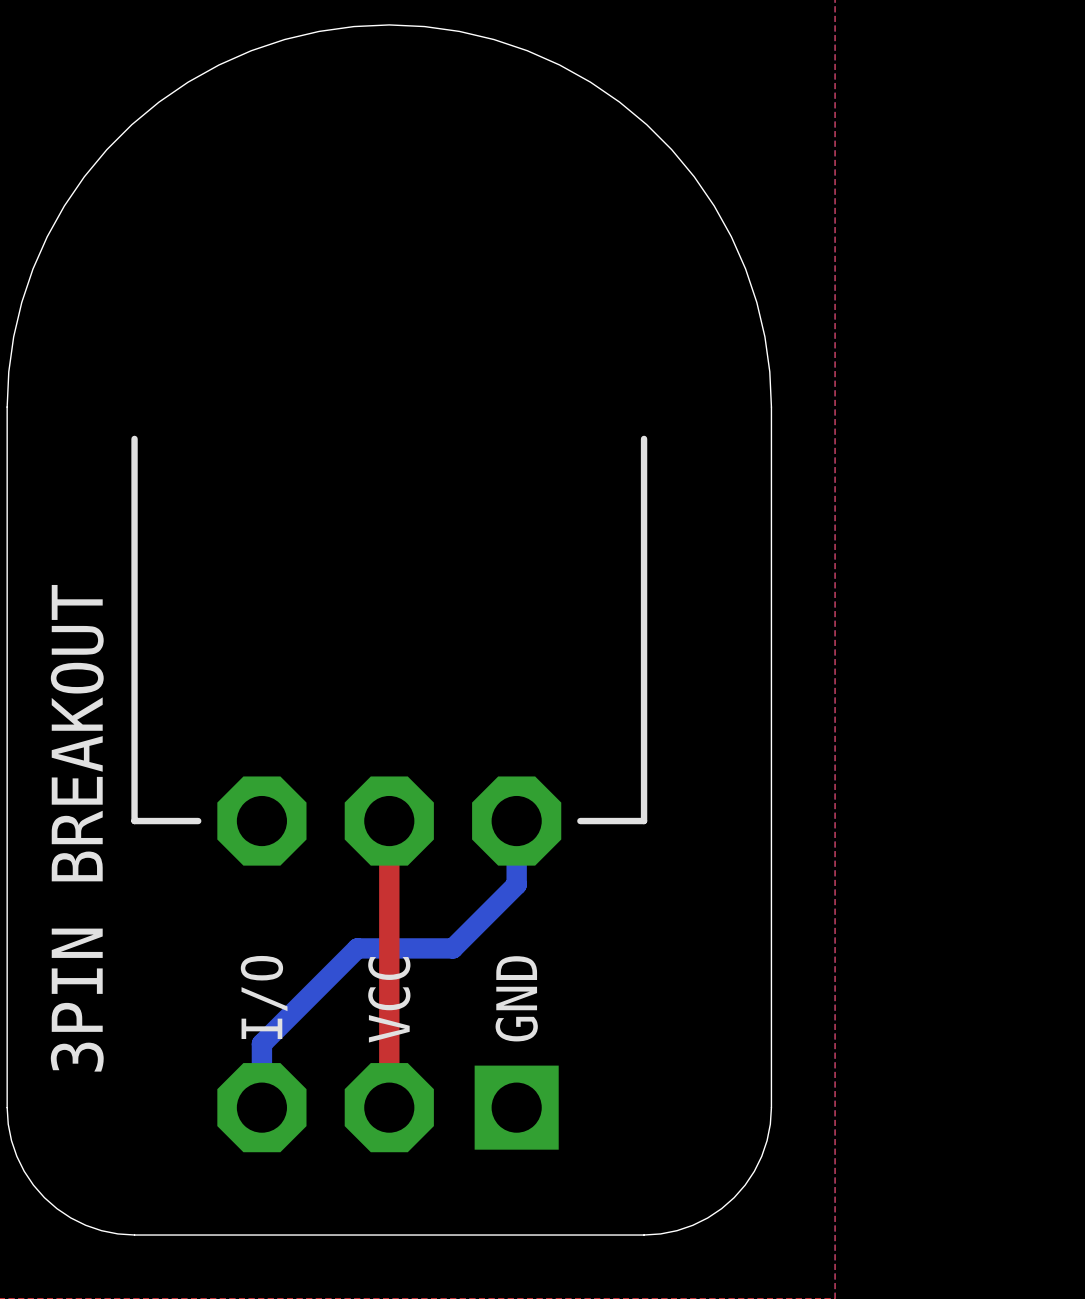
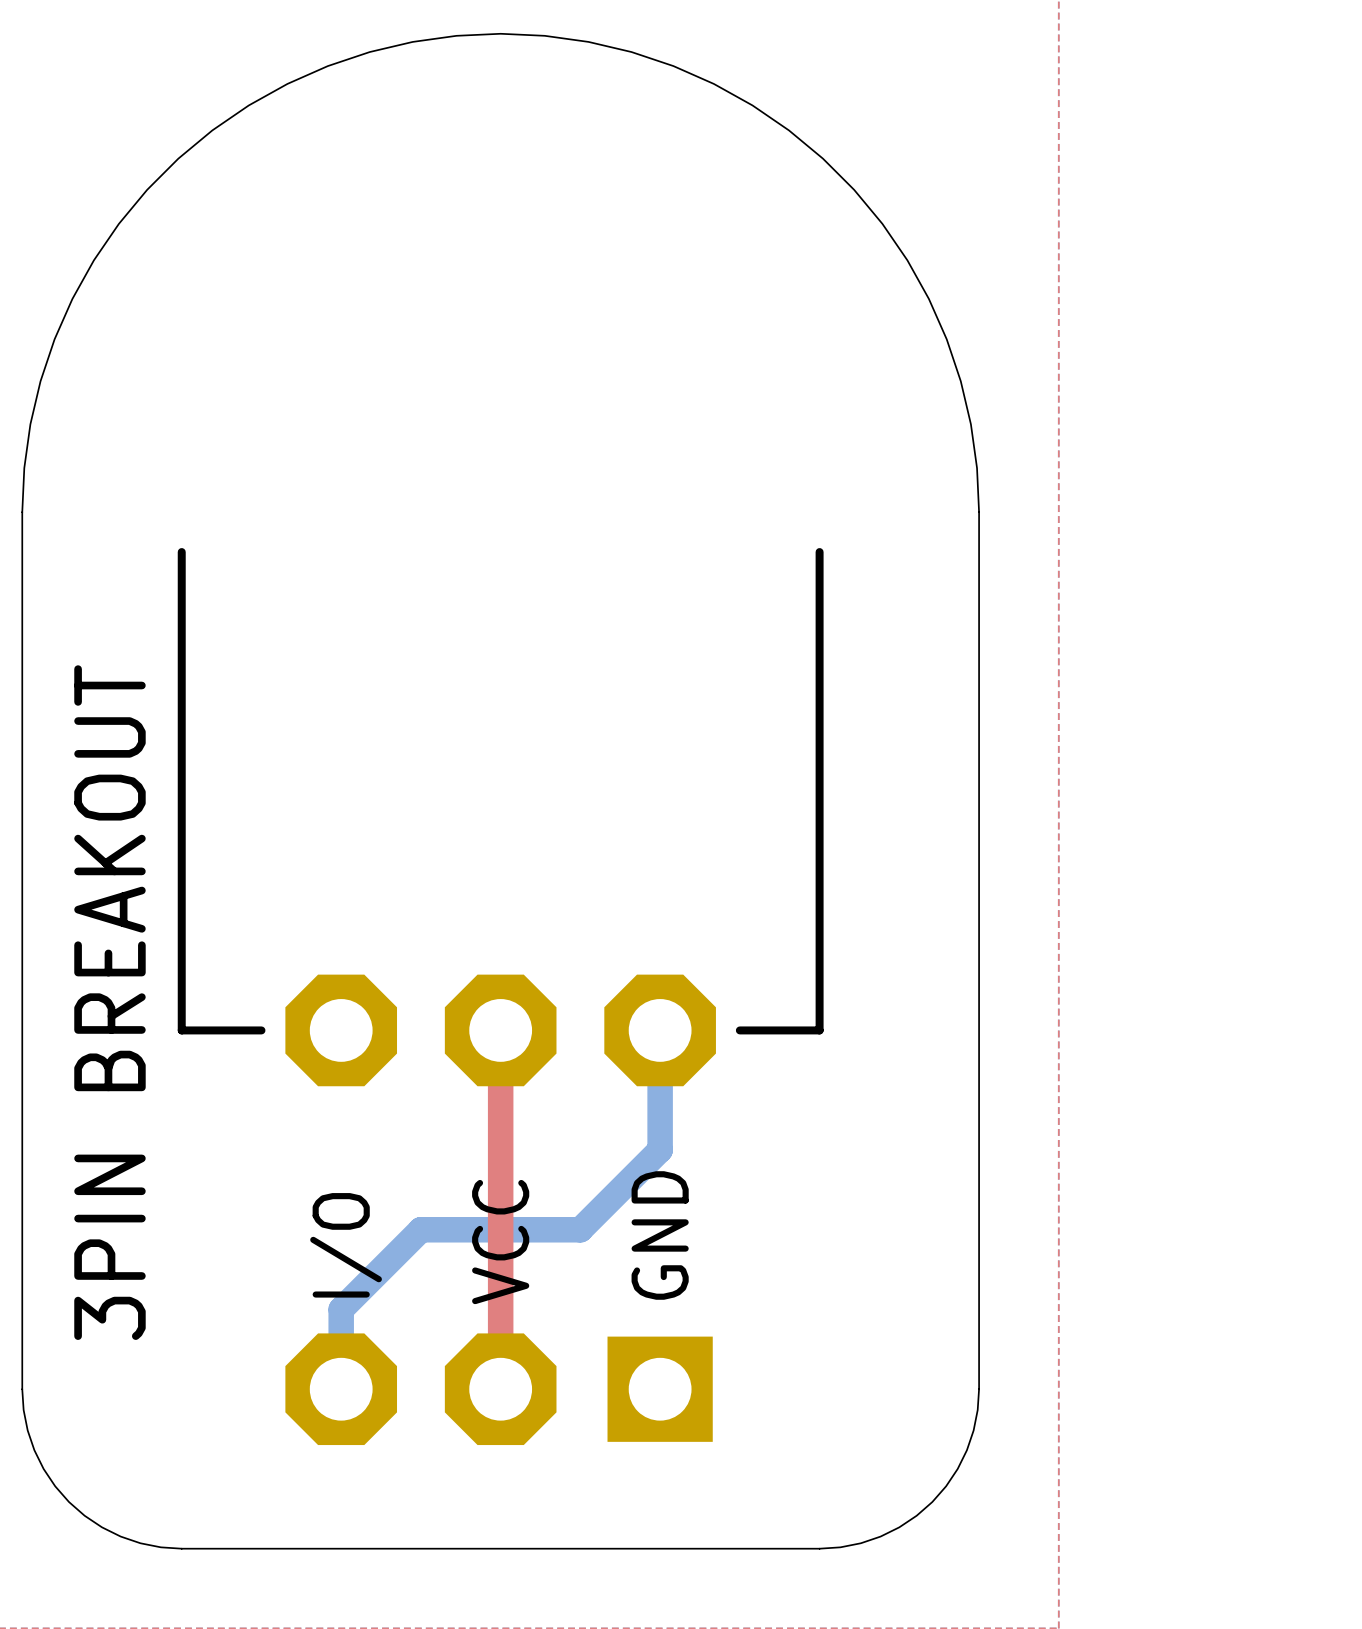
bottom track: (516, 884) (452, 948) (357, 948) (325, 980) -> (660, 1110) (660, 1150) (580, 1229) (420, 1229)

